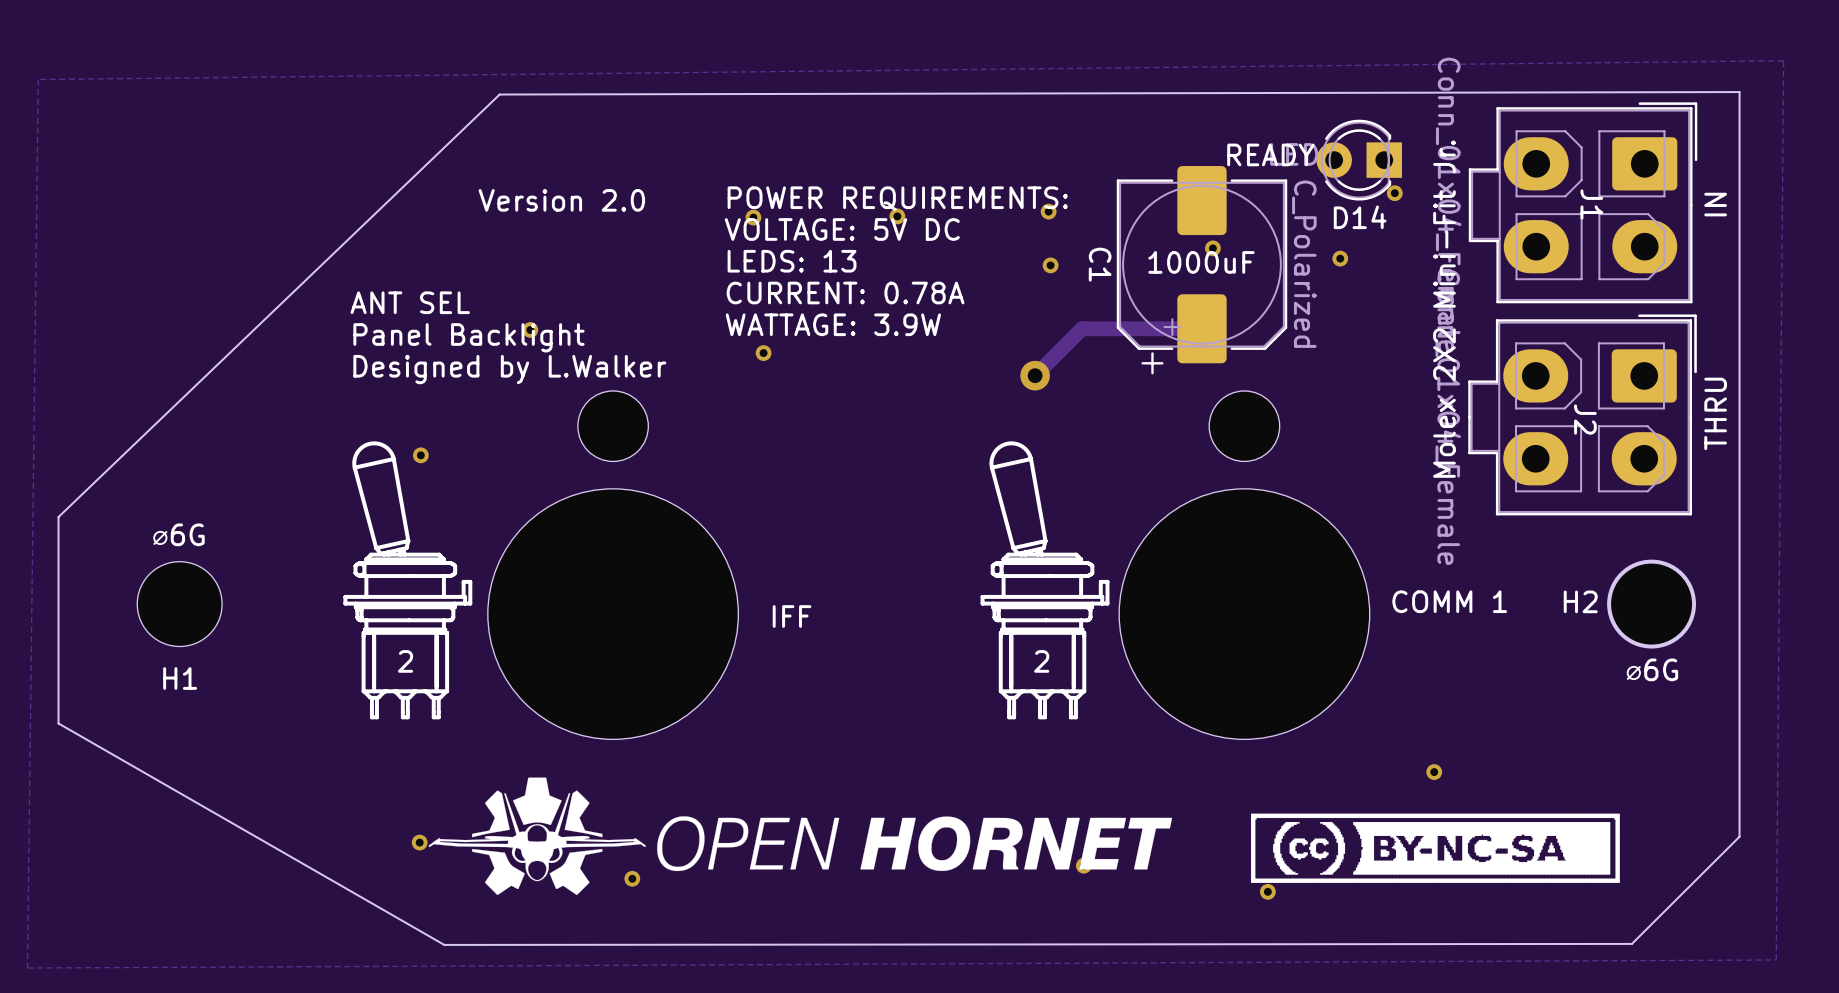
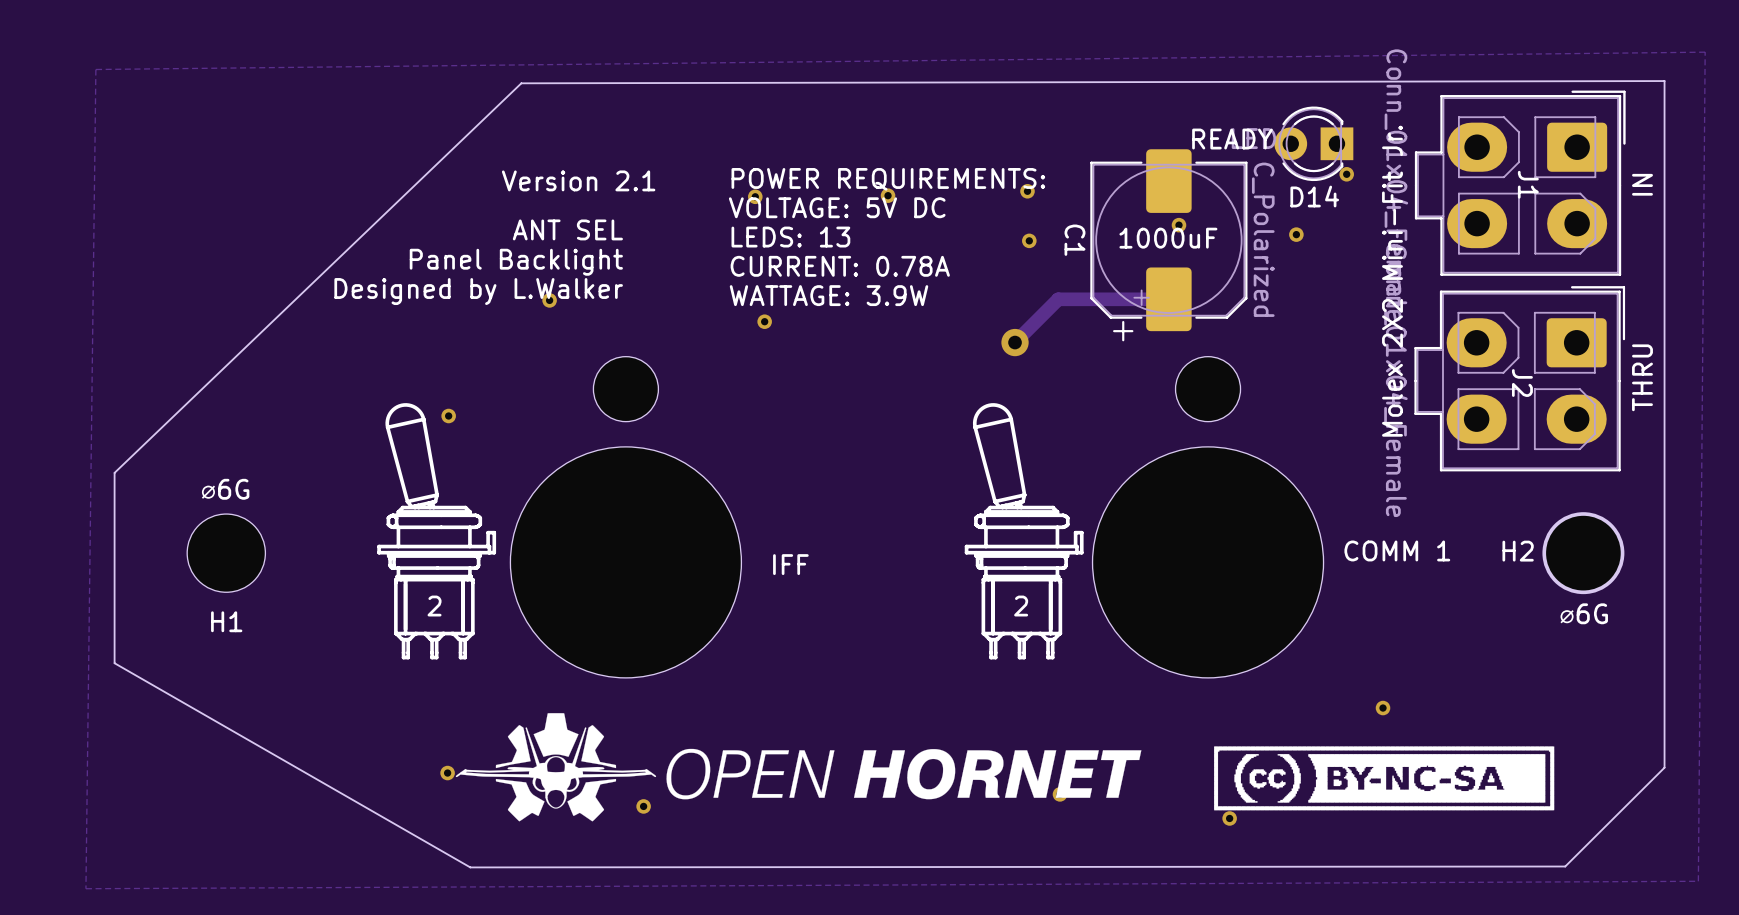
text: Version 2.0 (561, 200) -> Version 2.1 (578, 180)
text position: ANT SEL (410, 302) -> ANT SEL (567, 229)
text position: Panel Backlight (468, 337) -> Panel Backlight (516, 262)
text position: Designed by L.Walker (509, 369) -> Designed by L.Walker (478, 291)

